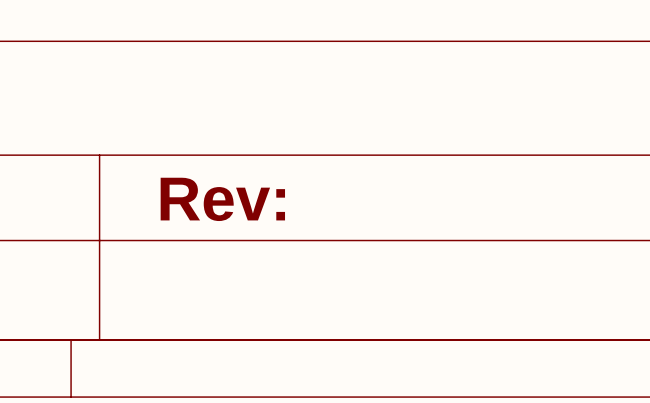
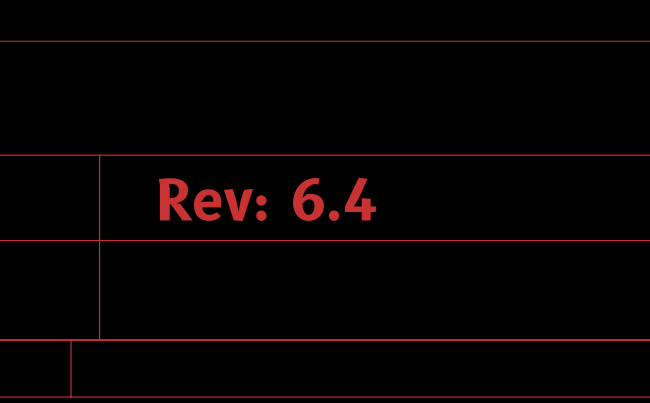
title block: Rev: (222, 199) -> Rev: 6.4 (267, 199)

